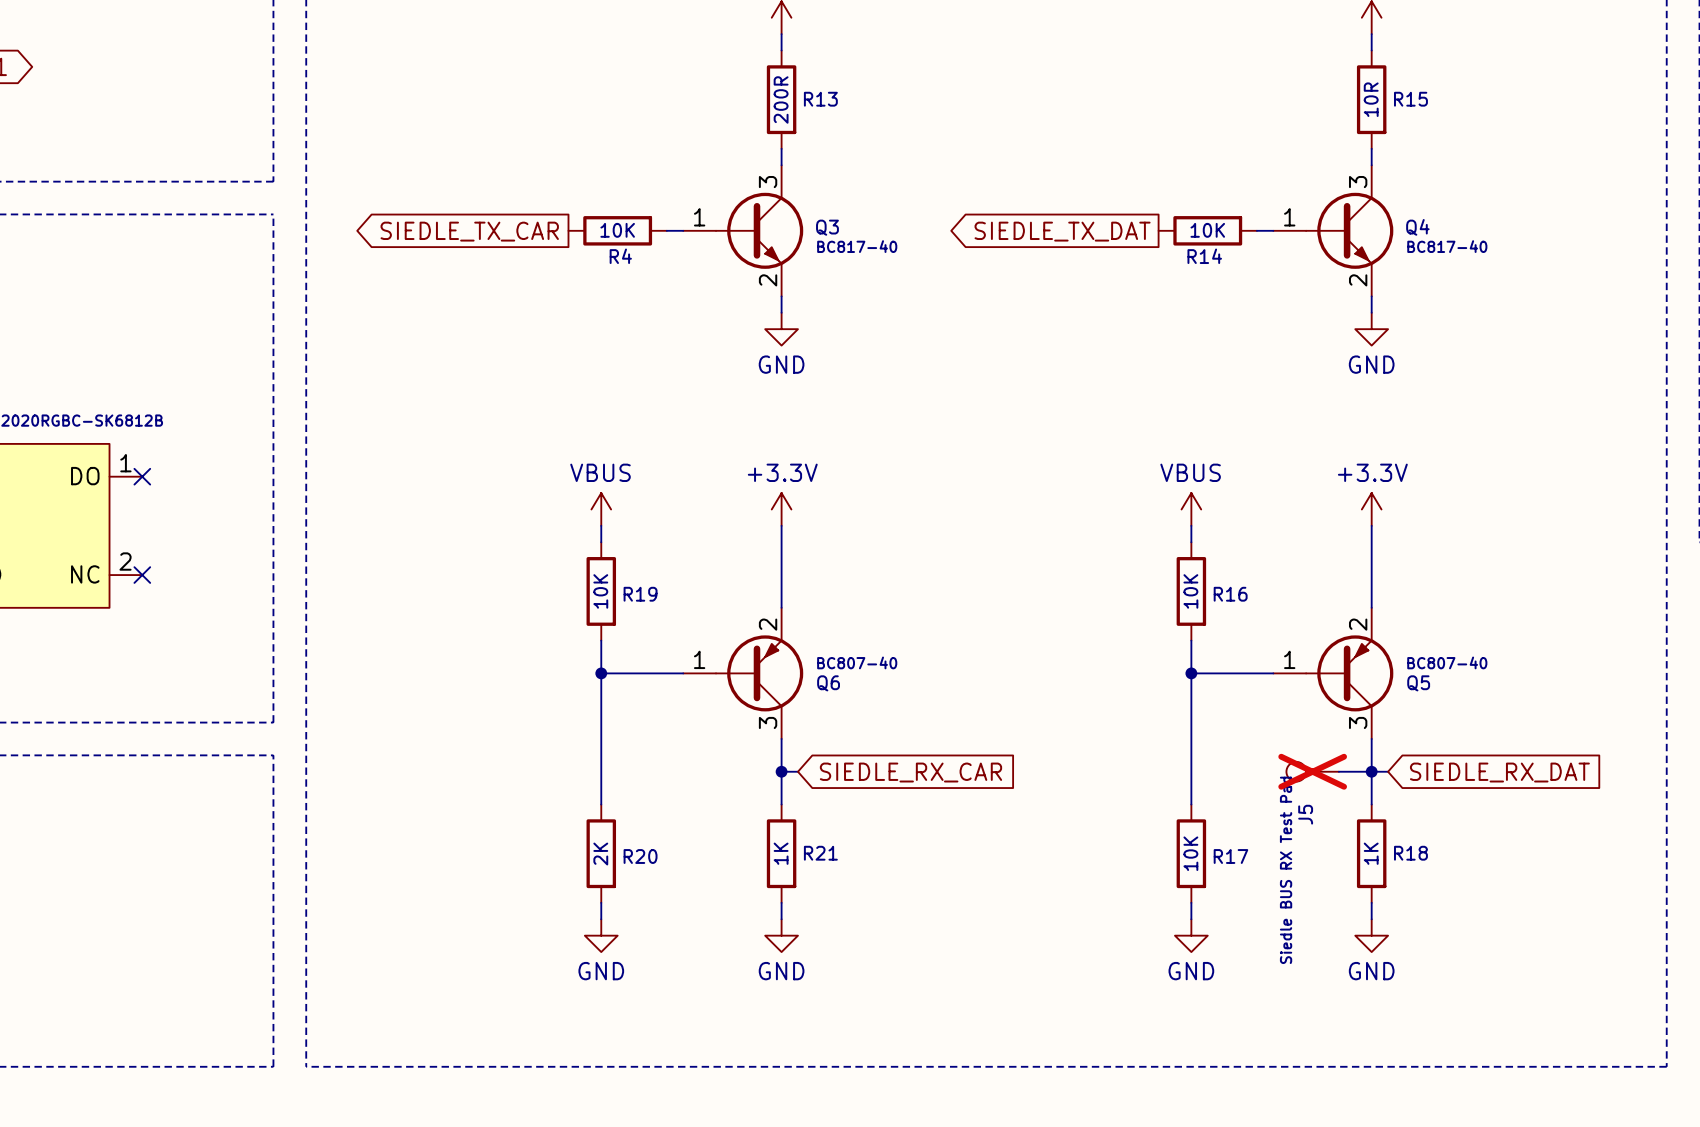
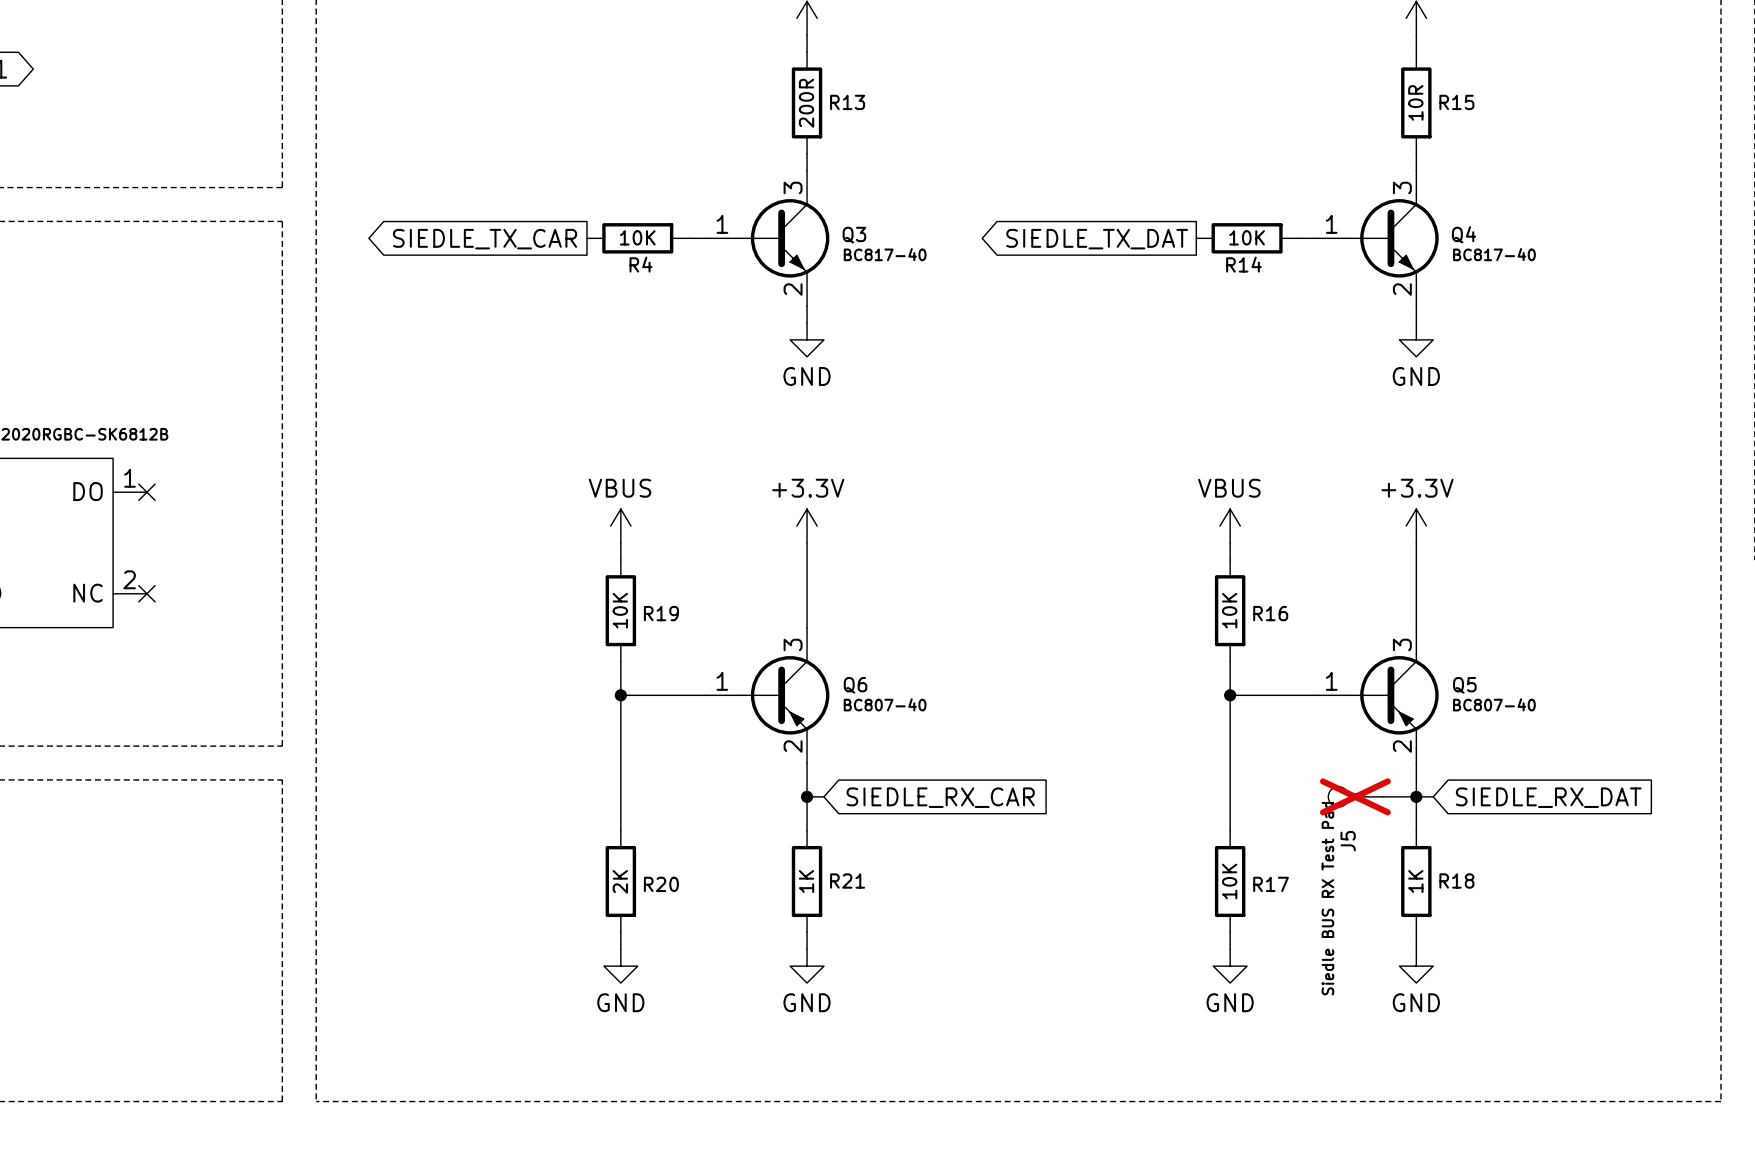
Q6 flip: as is (759, 673) -> up-down (784, 695)
Q5 flip: as is (1349, 673) -> up-down (1393, 695)

